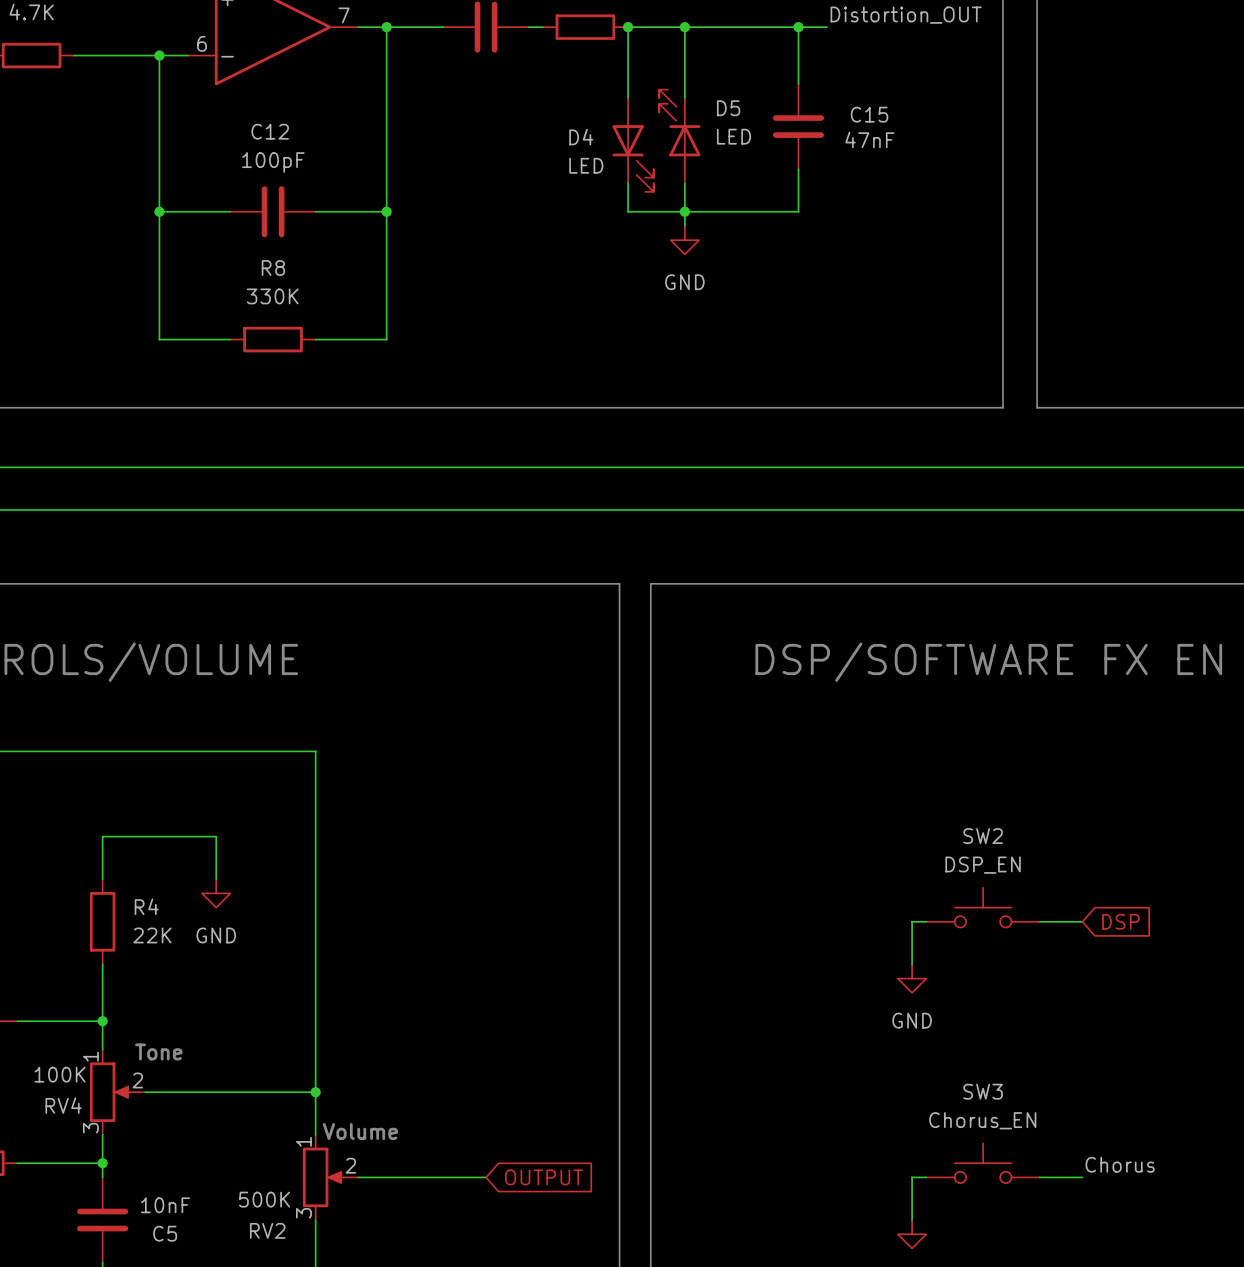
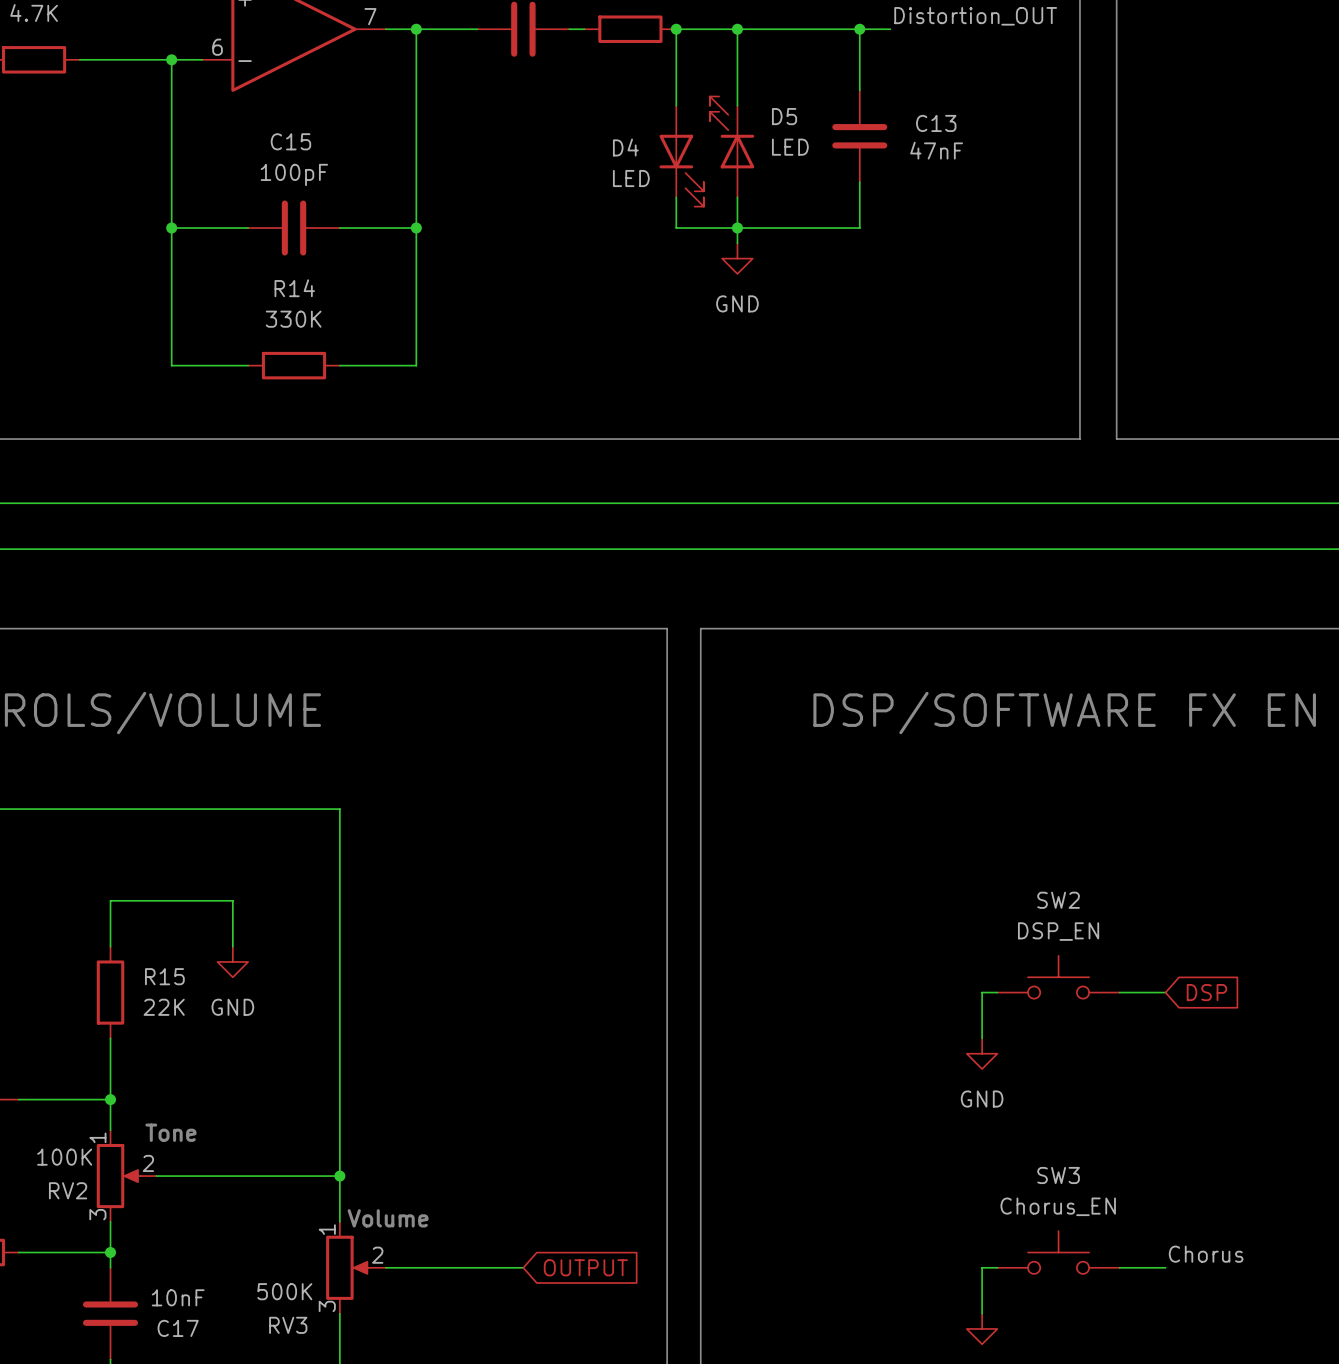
C15 name: C15 (869, 114) -> C13 (936, 123)
C12 name: C12 (270, 131) -> C15 (290, 141)
R8 name: R8 (273, 268) -> R14 (294, 288)
R4 name: R4 (146, 906) -> R15 (164, 976)
RV4 name: RV4 (63, 1105) -> RV2 (68, 1190)
RV2 name: RV2 (267, 1230) -> RV3 (288, 1325)
C5 name: C5 (165, 1233) -> C17 (178, 1328)

